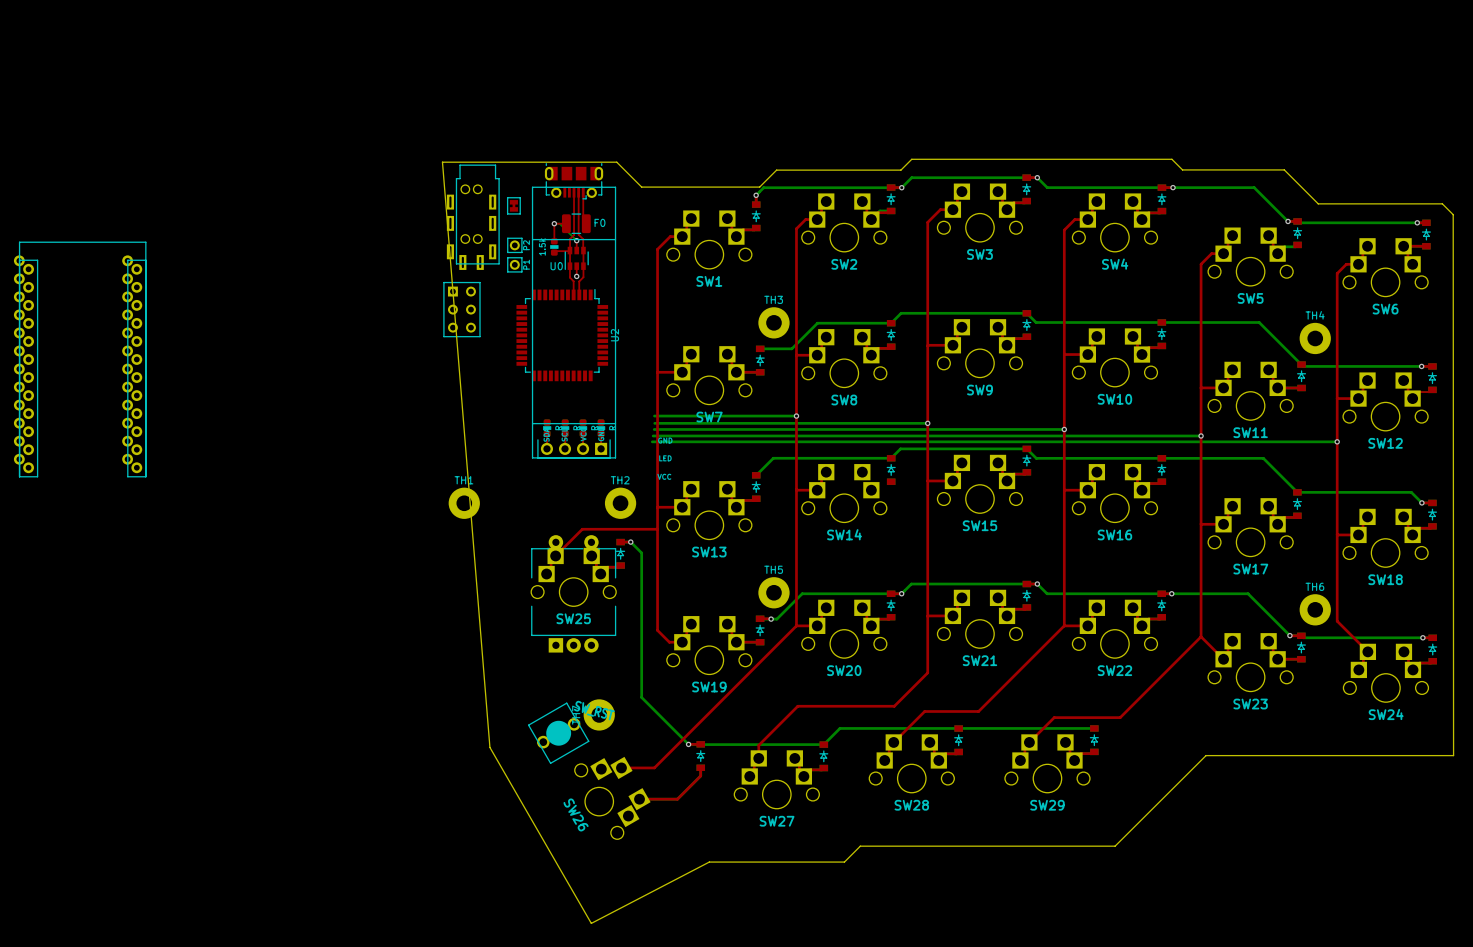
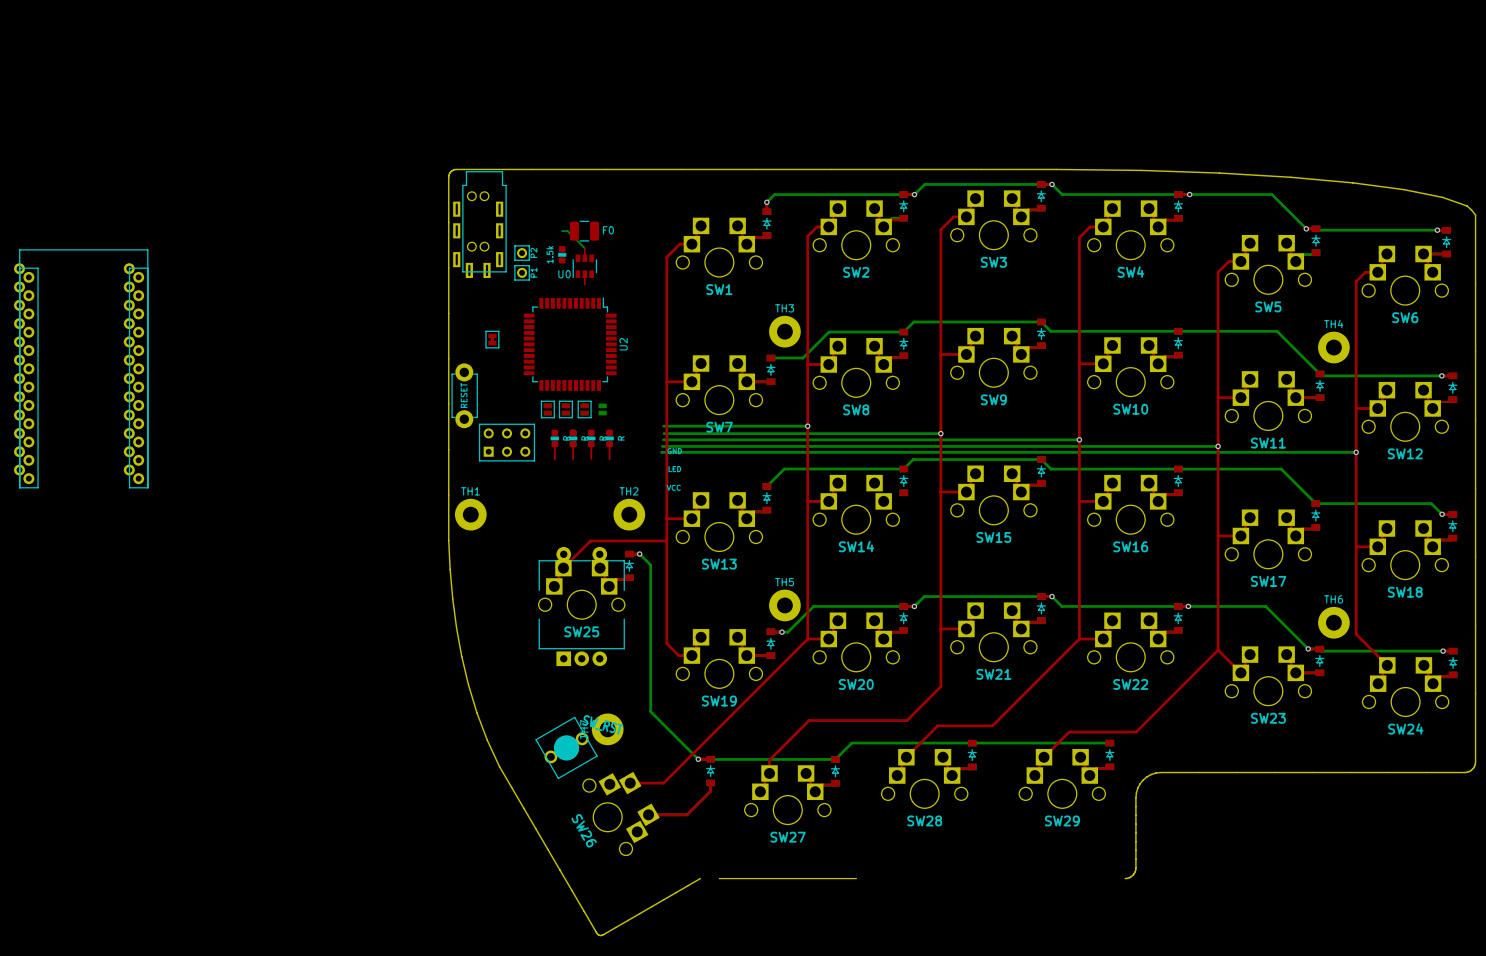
part: (574, 181) -> none
top track: (574, 192) (574, 235) (570, 239) (570, 266) -> none
top track: (578, 192) (578, 234) (583, 239) (583, 250) -> none
top track: (583, 192) (583, 221) (586, 223) -> none
part position: (513, 205) -> (492, 339)
via: (554, 223) -> none
top track: (566, 223) (554, 223) (554, 241) -> none
via: (576, 240) -> none
top track: (583, 249) (583, 277) (579, 281) (579, 294) -> none
top track: (569, 250) (554, 252) -> none
top track: (569, 266) (569, 277) (573, 281) (573, 294) -> none
via: (576, 276) -> none
part rotation: 0° (461, 309) -> 90° counterclockwise (507, 442)
part position: (461, 309) -> (507, 442)
part: (574, 322) -> none
part: none -> (464, 395)
part: none -> (547, 409)
part: none -> (565, 409)
part: none -> (584, 409)
part: none -> (602, 409)
board edge: none -> (1135, 867) (1132, 875) (1125, 878)
board edge: none -> (1135, 867) (1136, 792) (1143, 779) (1156, 773) (1464, 772) (1470, 770) (1474, 765) (1475, 215) (1471, 209) (1467, 205) (1442, 197) (1403, 189) (1290, 177) (1219, 173) (1056, 169) (453, 170) (448, 177) (448, 540) (456, 627) (468, 685) (477, 713) (499, 766) (598, 934) (603, 934) (700, 878)
board edge: (709, 862) (591, 923) (489, 747) (442, 162) (616, 162) (641, 187) (759, 187) (776, 170) (900, 170) (911, 159) (1171, 159) (1182, 169) (1284, 169) (1318, 203) (1442, 203) (1453, 214) (1453, 755) (1206, 755) (1115, 846) (860, 846) (844, 862) -> none

